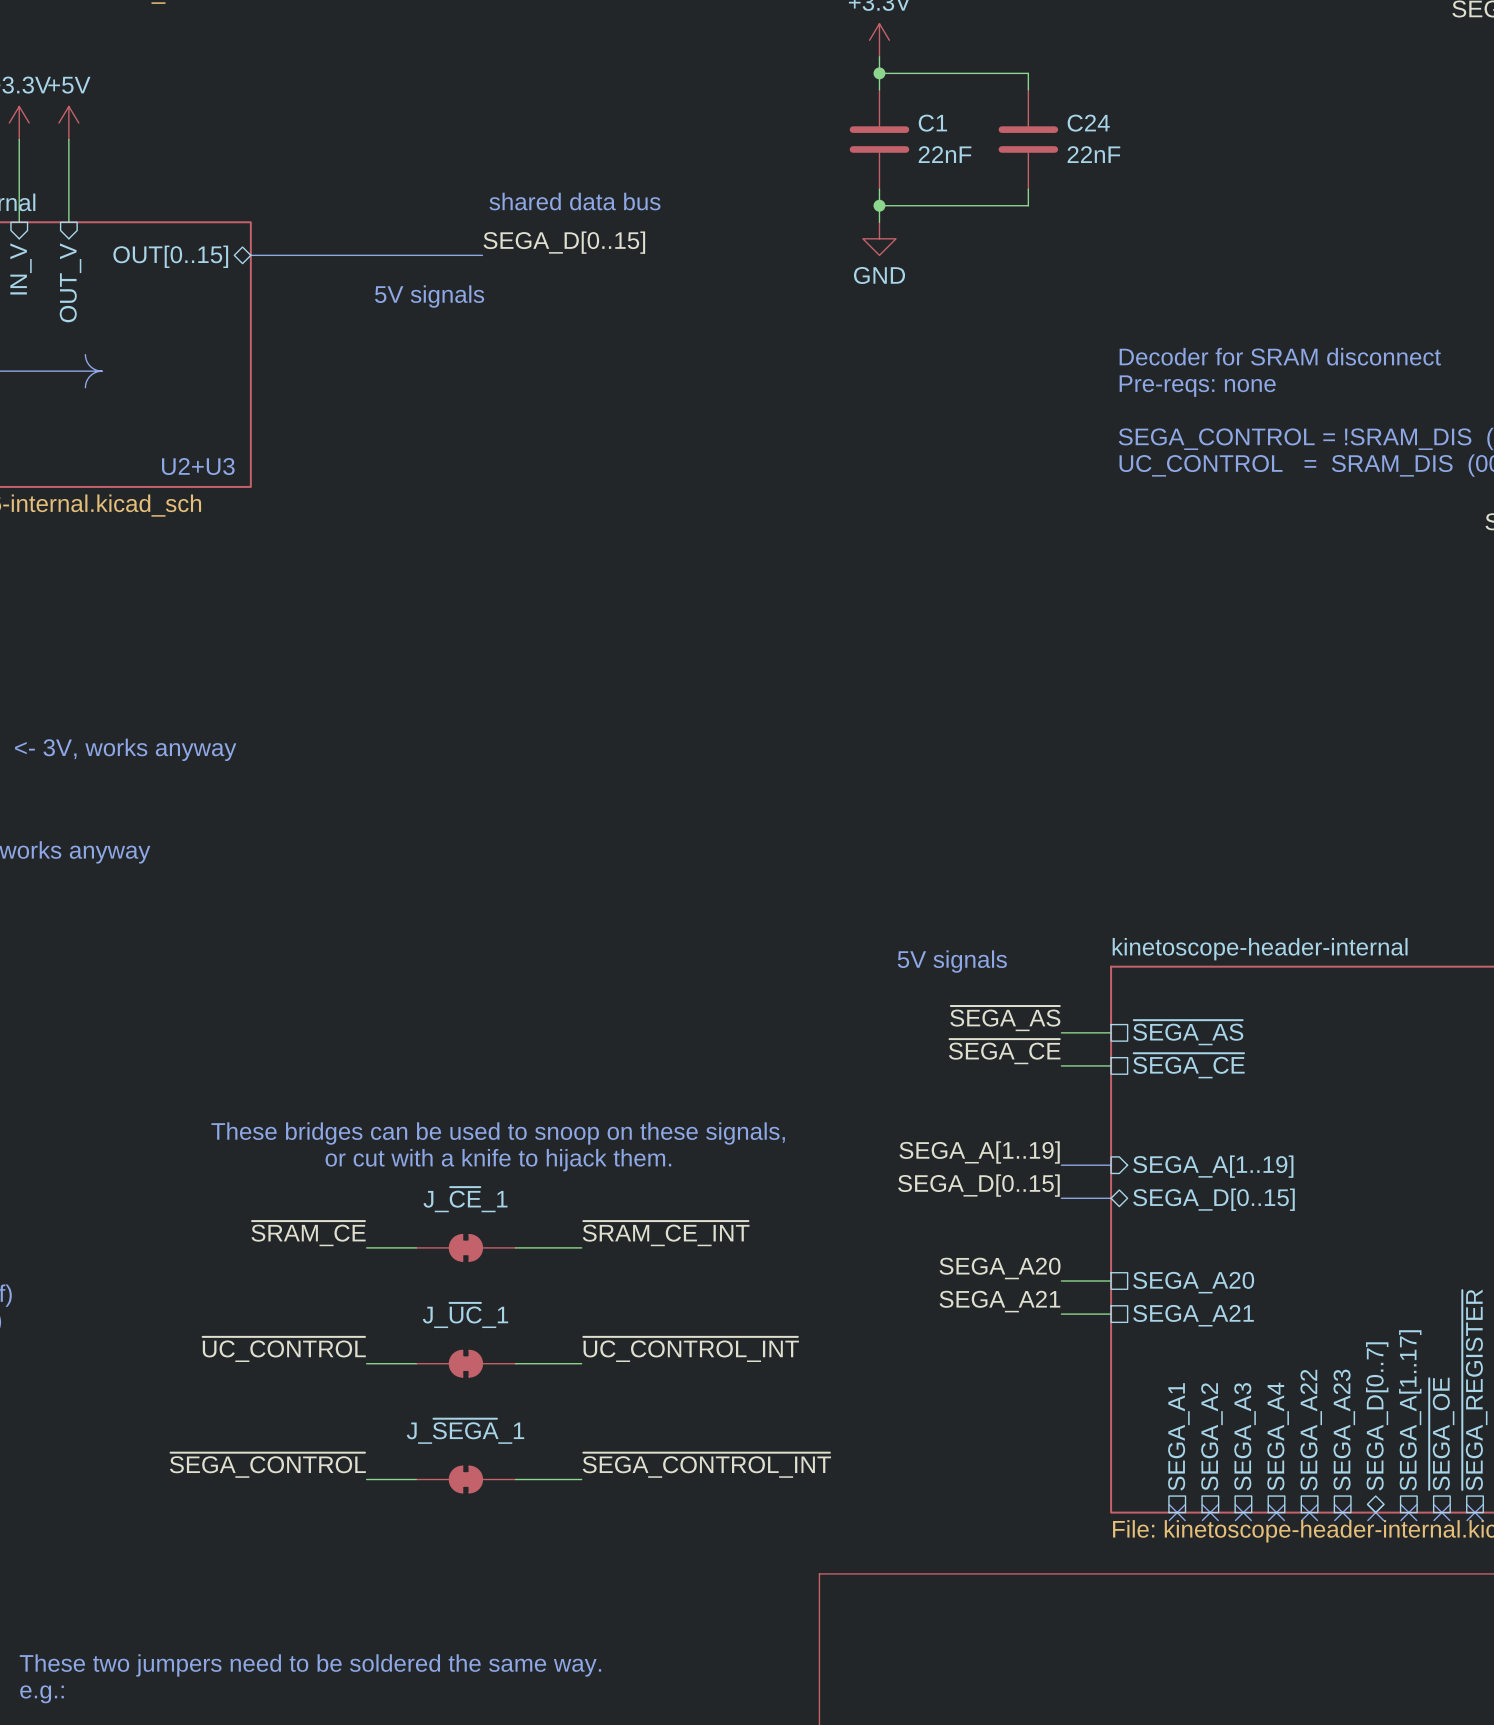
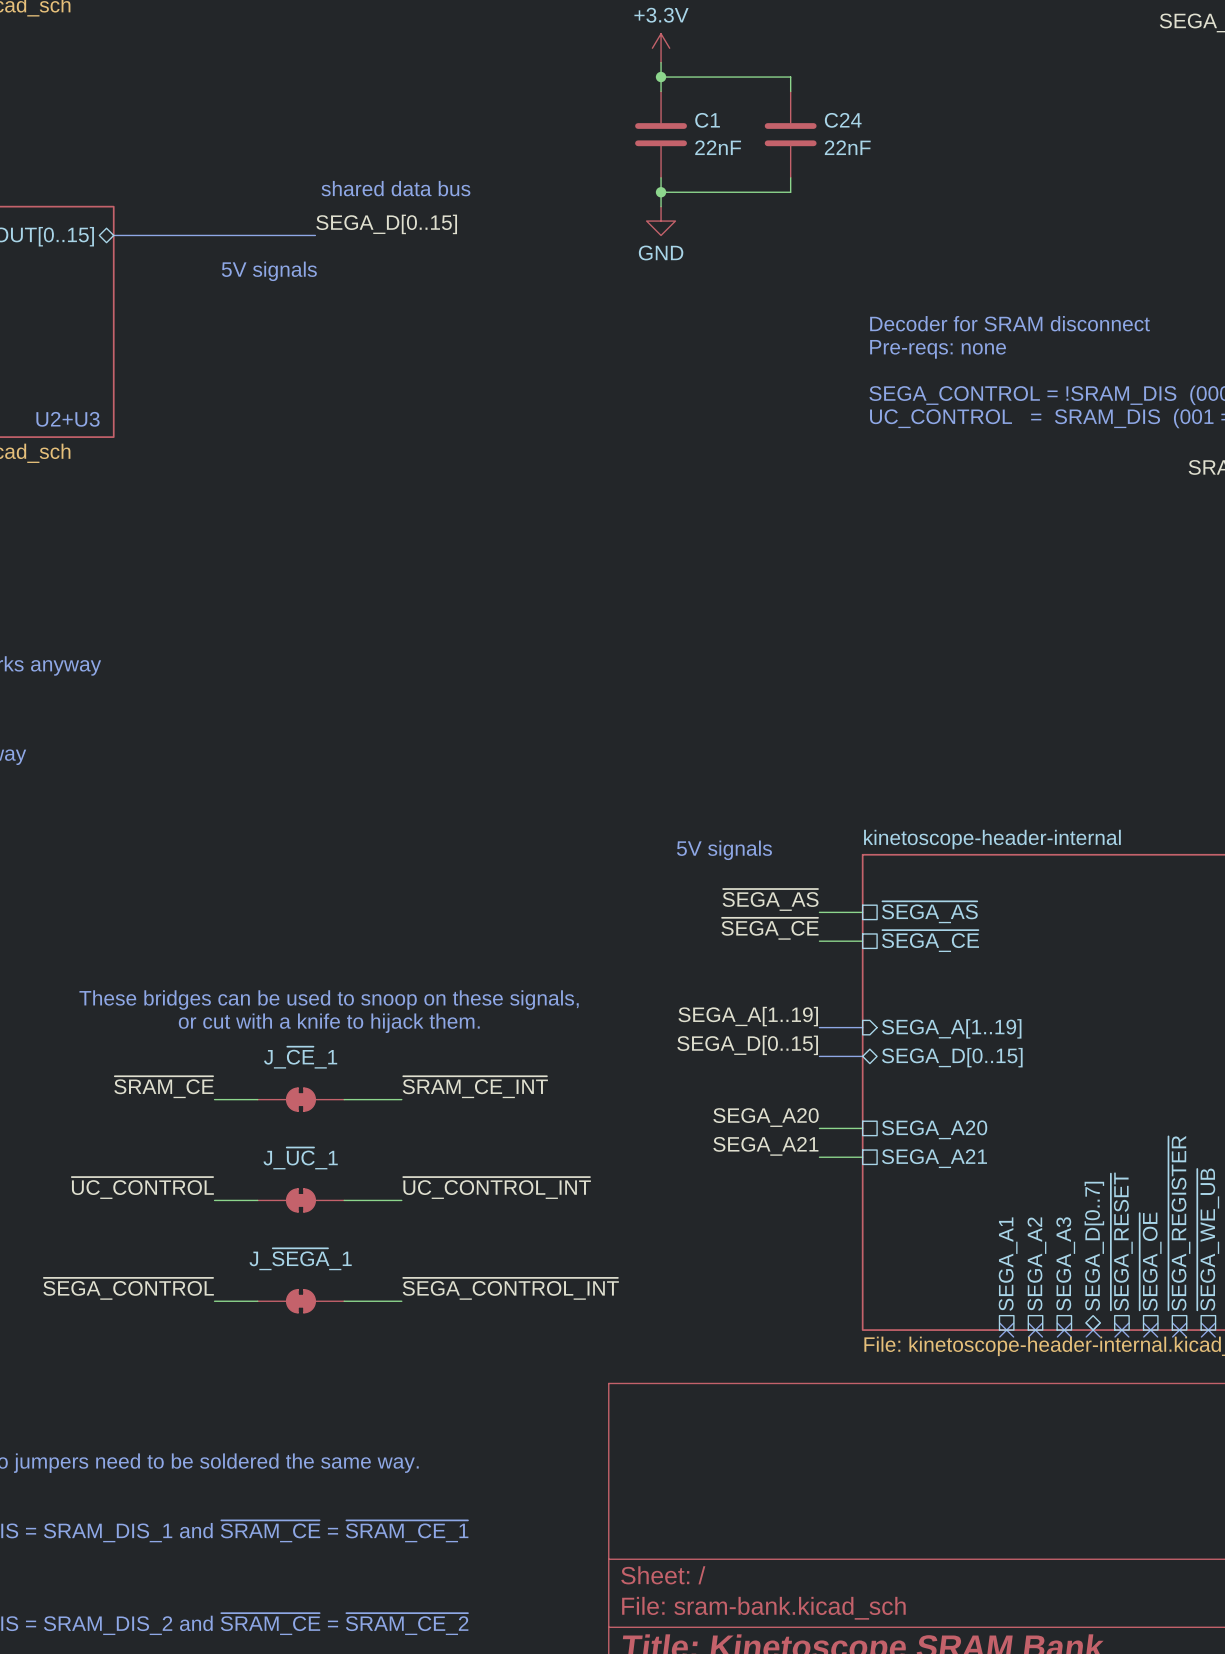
sheet pin: SEGA_A[1..17] (1410, 1410) -> ~{SEGA_RESET} (1121, 1241)
sheet pin: SEGA_A22 (1311, 1430) -> SEGA_A2 (1036, 1264)
sheet pin: SEGA_A23 (1344, 1430) -> SEGA_A3 (1065, 1264)
sheet pin: SEGA_A1 (1178, 1436) -> none
sheet pin: SEGA_A2 (1211, 1436) -> none
sheet pin: SEGA_A3 (1245, 1436) -> none
sheet pin: SEGA_A4 (1278, 1436) -> SEGA_A1 (1008, 1264)
no-connect mark: (1177, 1512) -> none
no-connect mark: (1210, 1512) -> none
no-connect mark: (1243, 1512) -> none

